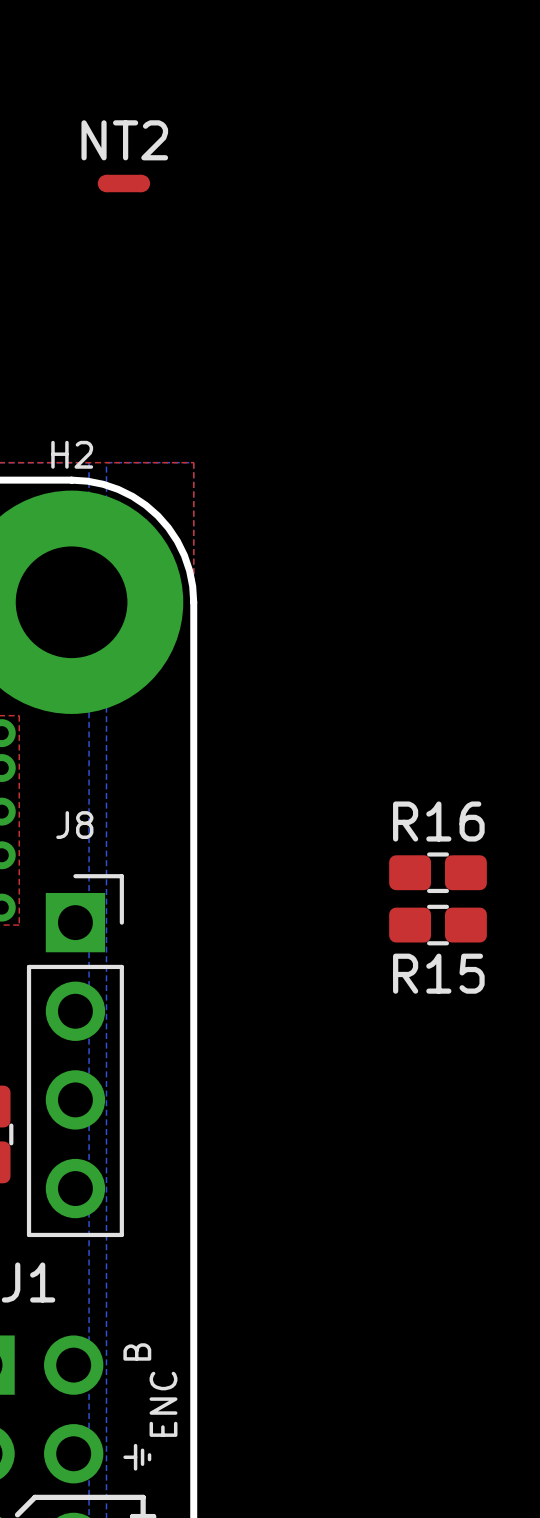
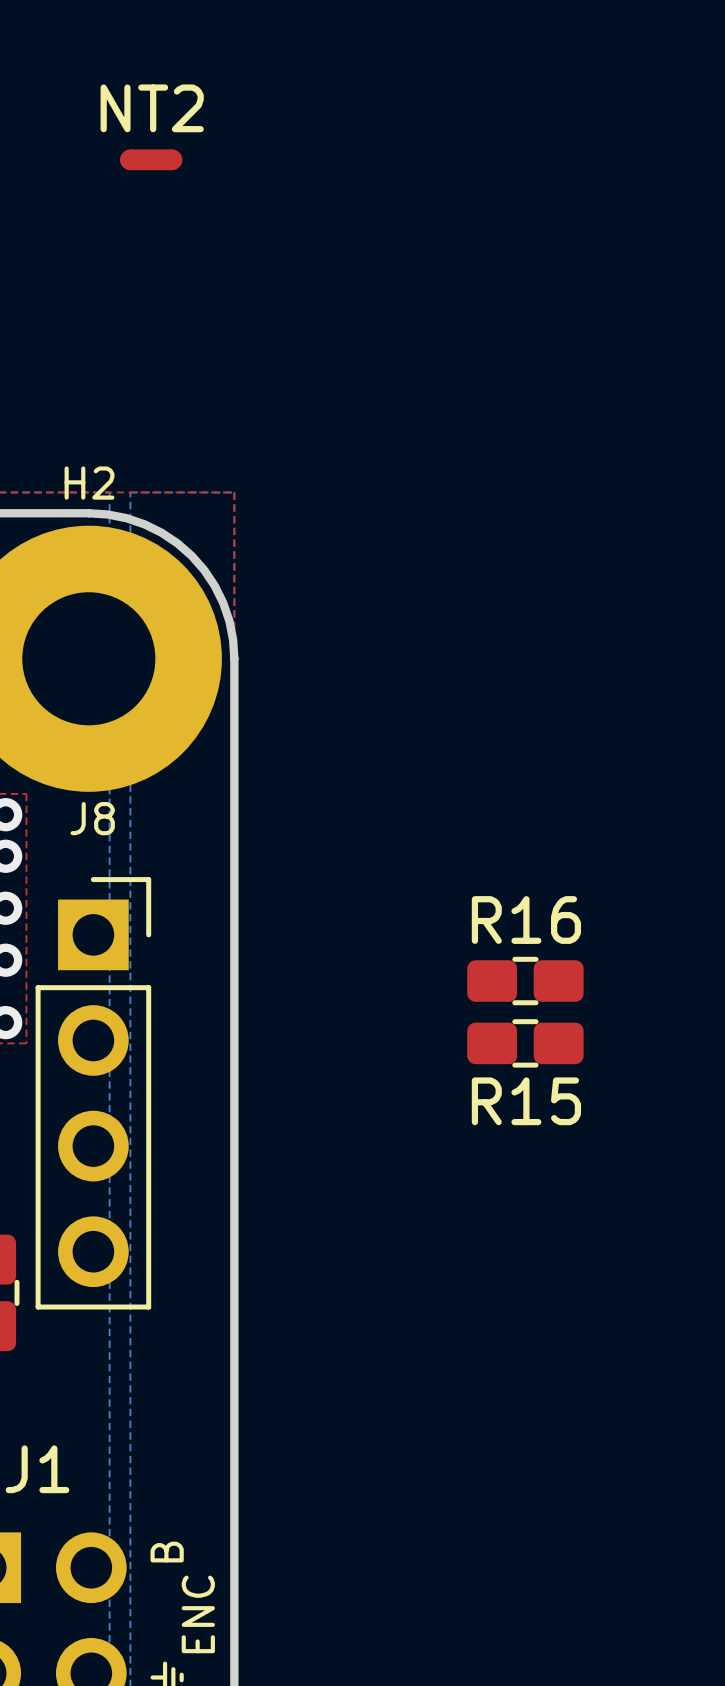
J8 position: (75, 1055) -> (93, 1093)

